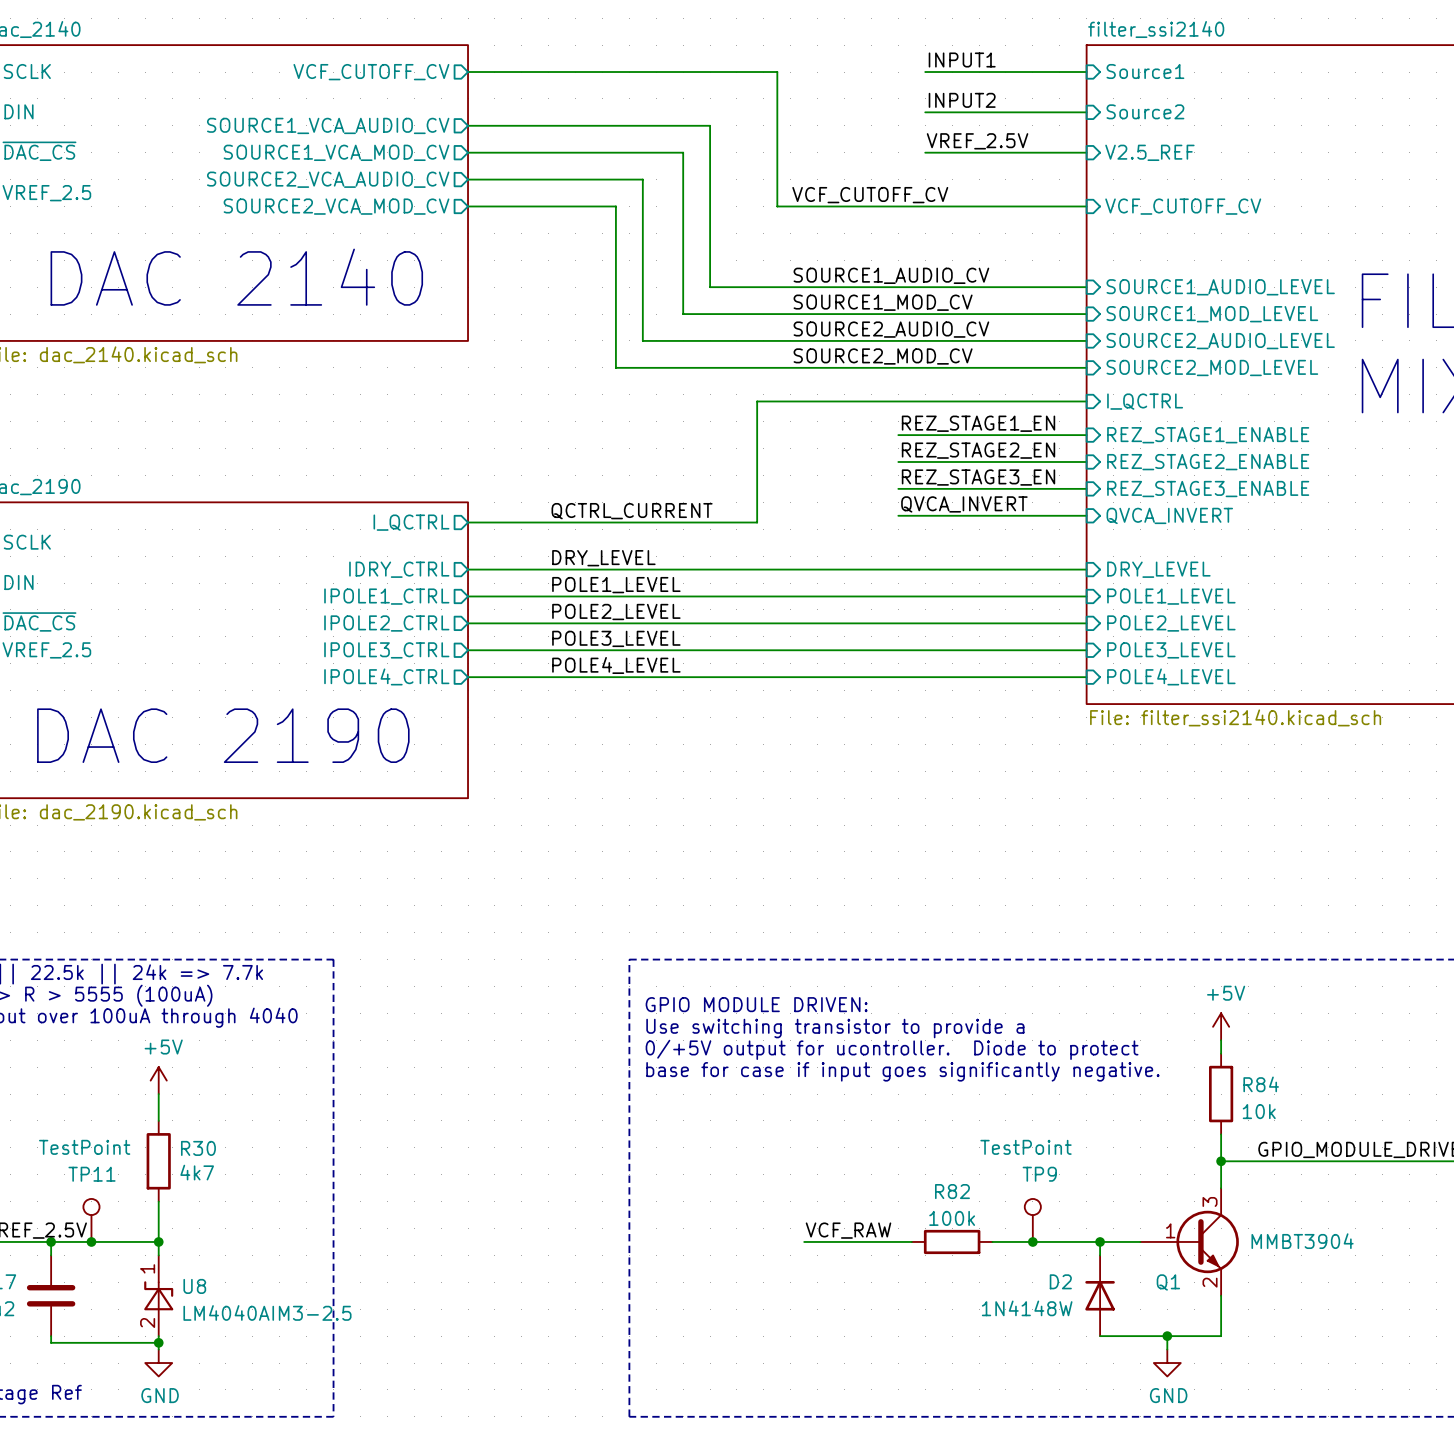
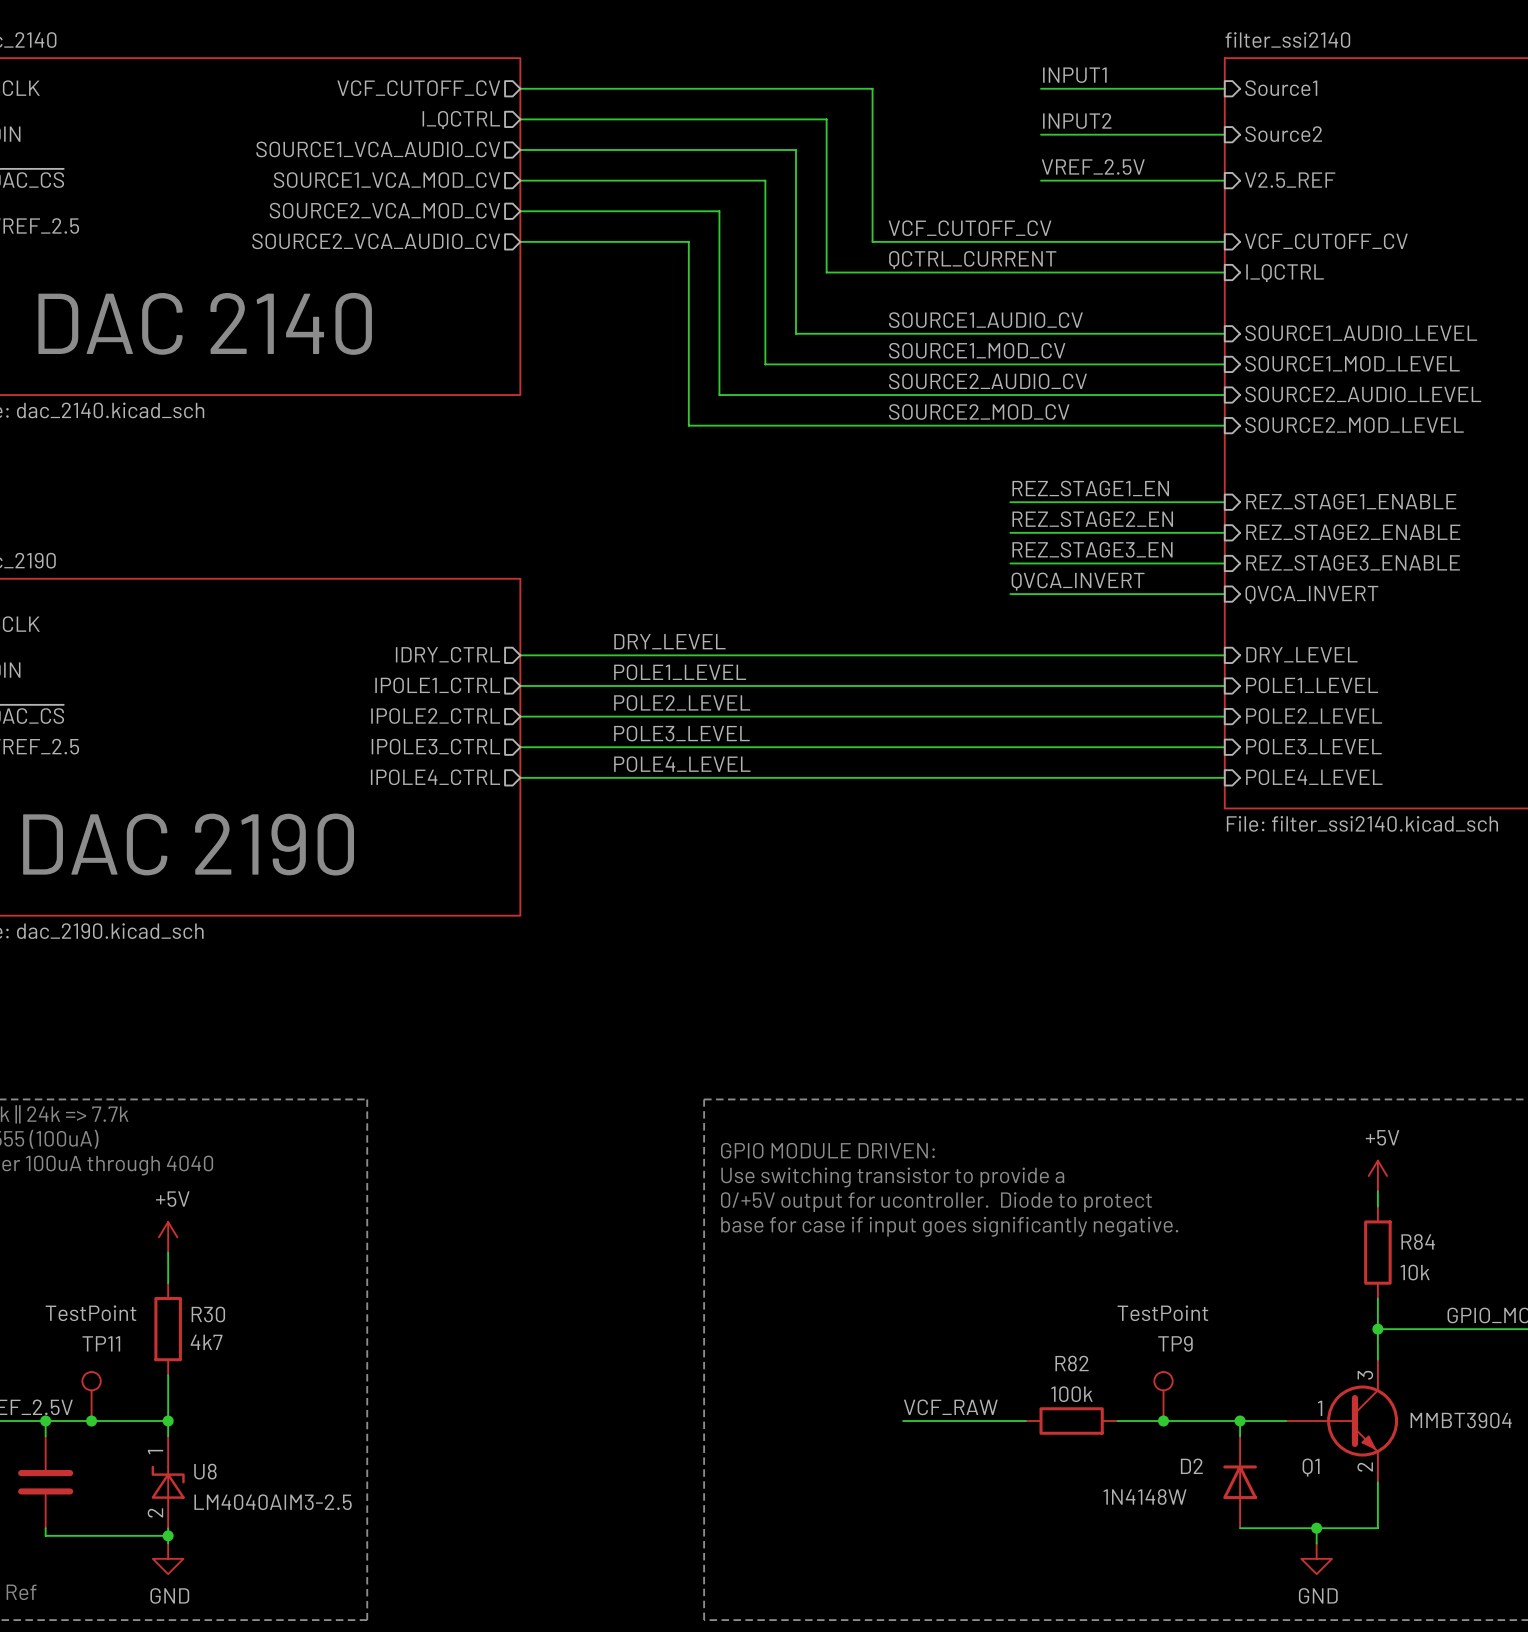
wire: none -> (520, 119) (826, 119) (826, 272) (1224, 272)
sheet pin: none -> I_QCTRL (461, 119)
sheet pin: SOURCE2_VCA_AUDIO_CV (328, 179) -> SOURCE2_VCA_MOD_CV (384, 210)
sheet pin: SOURCE2_VCA_MOD_CV (336, 206) -> SOURCE2_VCA_AUDIO_CV (376, 241)
label: none -> QCTRL_CURRENT (972, 260)
wire: (1086, 401) (757, 401) (757, 522) (468, 522) -> none
sheet pin position: I_QCTRL (1145, 401) -> I_QCTRL (1285, 273)
label: QCTRL_CURRENT (632, 511) -> none
sheet pin: I_QCTRL (411, 522) -> none

